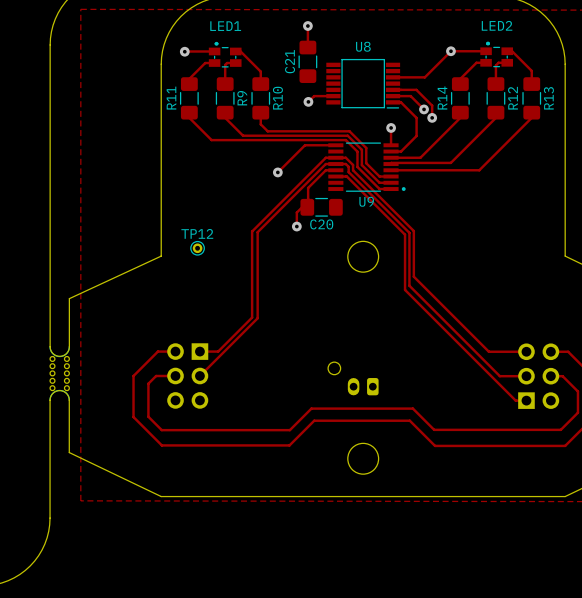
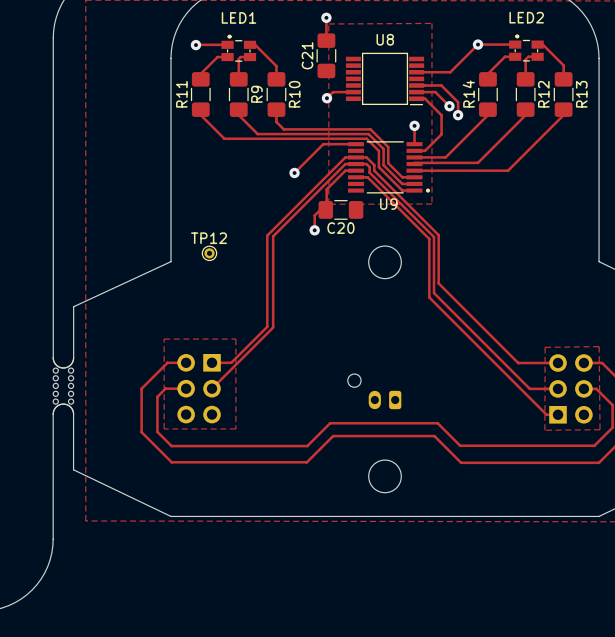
zone outline: none -> (431, 23) (328, 24) (328, 204) (431, 204) (431, 23)
zone outline: none -> (164, 339) (164, 428) (235, 428) (235, 339) (164, 339)
zone outline: none -> (599, 346) (545, 347) (544, 430) (600, 429) (599, 346)

